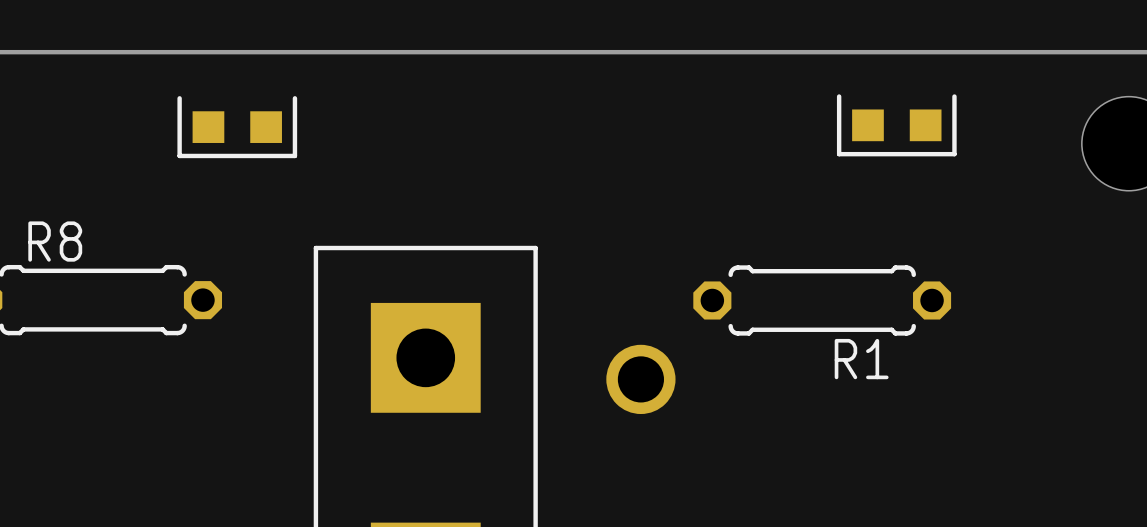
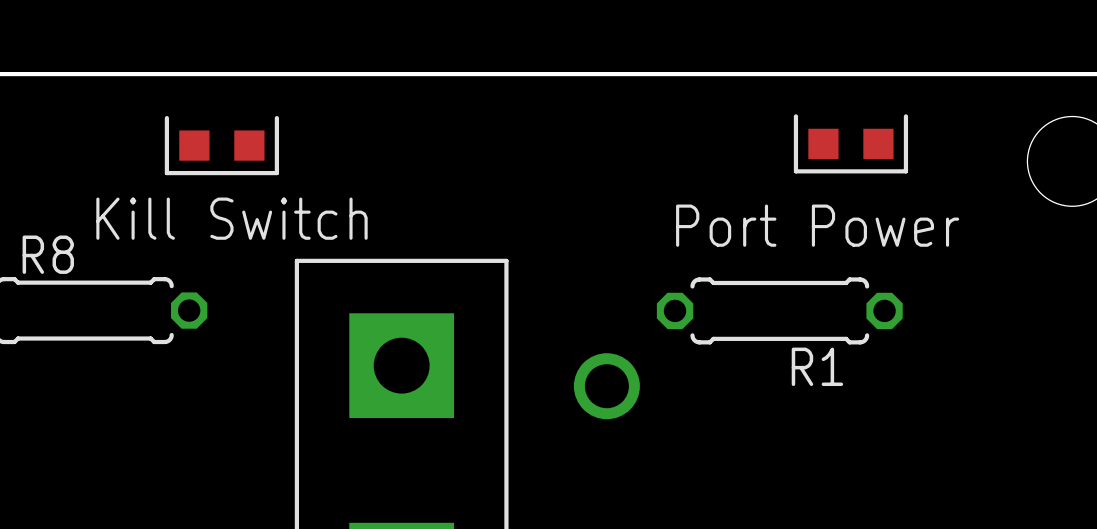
text: none -> Kill Switch (232, 218)
text: none -> Port Power (817, 225)

